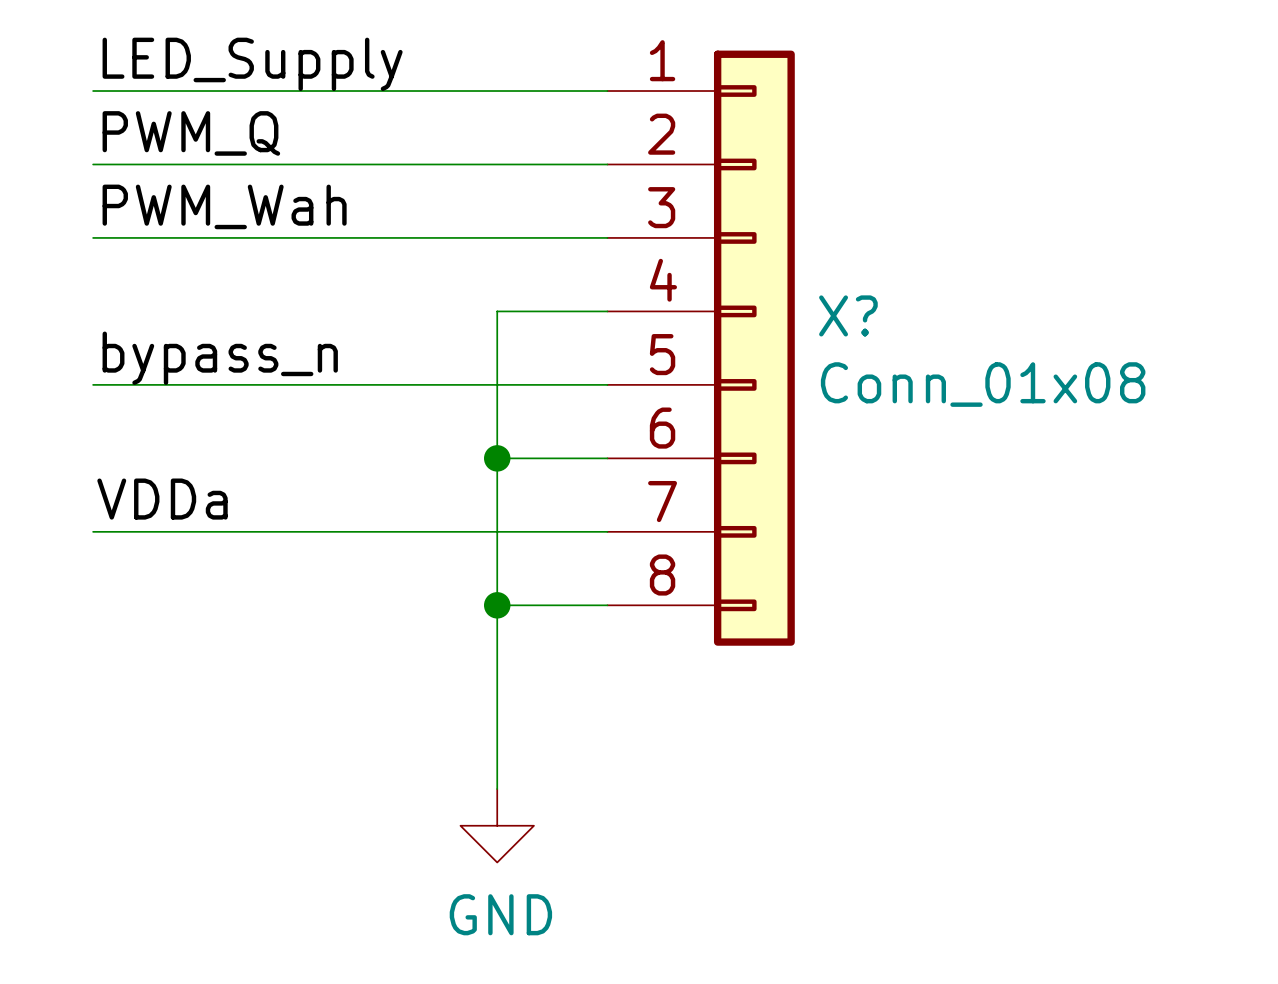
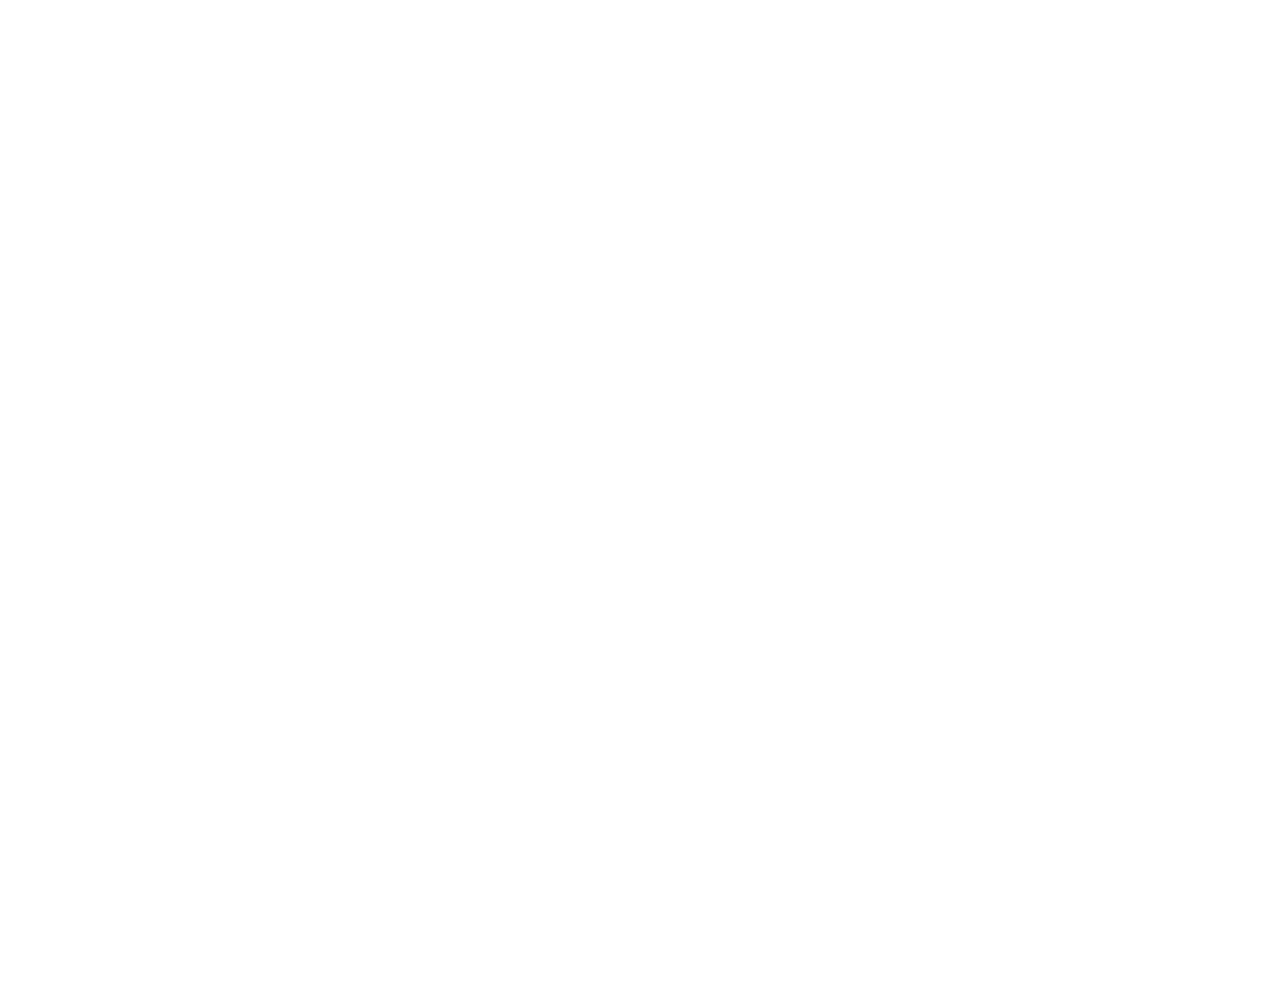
label: LED_Supply (252, 64) -> none
wire: (93, 91) (607, 91) -> none
label: PWM_Q (191, 133) -> none
wire: (93, 164) (607, 164) -> none
label: PWM_Wah (224, 206) -> none
wire: (93, 237) (607, 237) -> none
wire: (607, 311) (497, 311) (497, 789) -> none
X?: Conn_01x08 (701, 348) -> none
label: bypass_n (220, 358) -> none
wire: (93, 384) (607, 384) -> none
wire: (497, 458) (607, 458) -> none
junction: (497, 458) -> none
label: VDDa (162, 499) -> none
wire: (93, 531) (607, 531) -> none
wire: (497, 605) (607, 605) -> none
junction: (497, 605) -> none
power symbol: GND (497, 825) -> none

